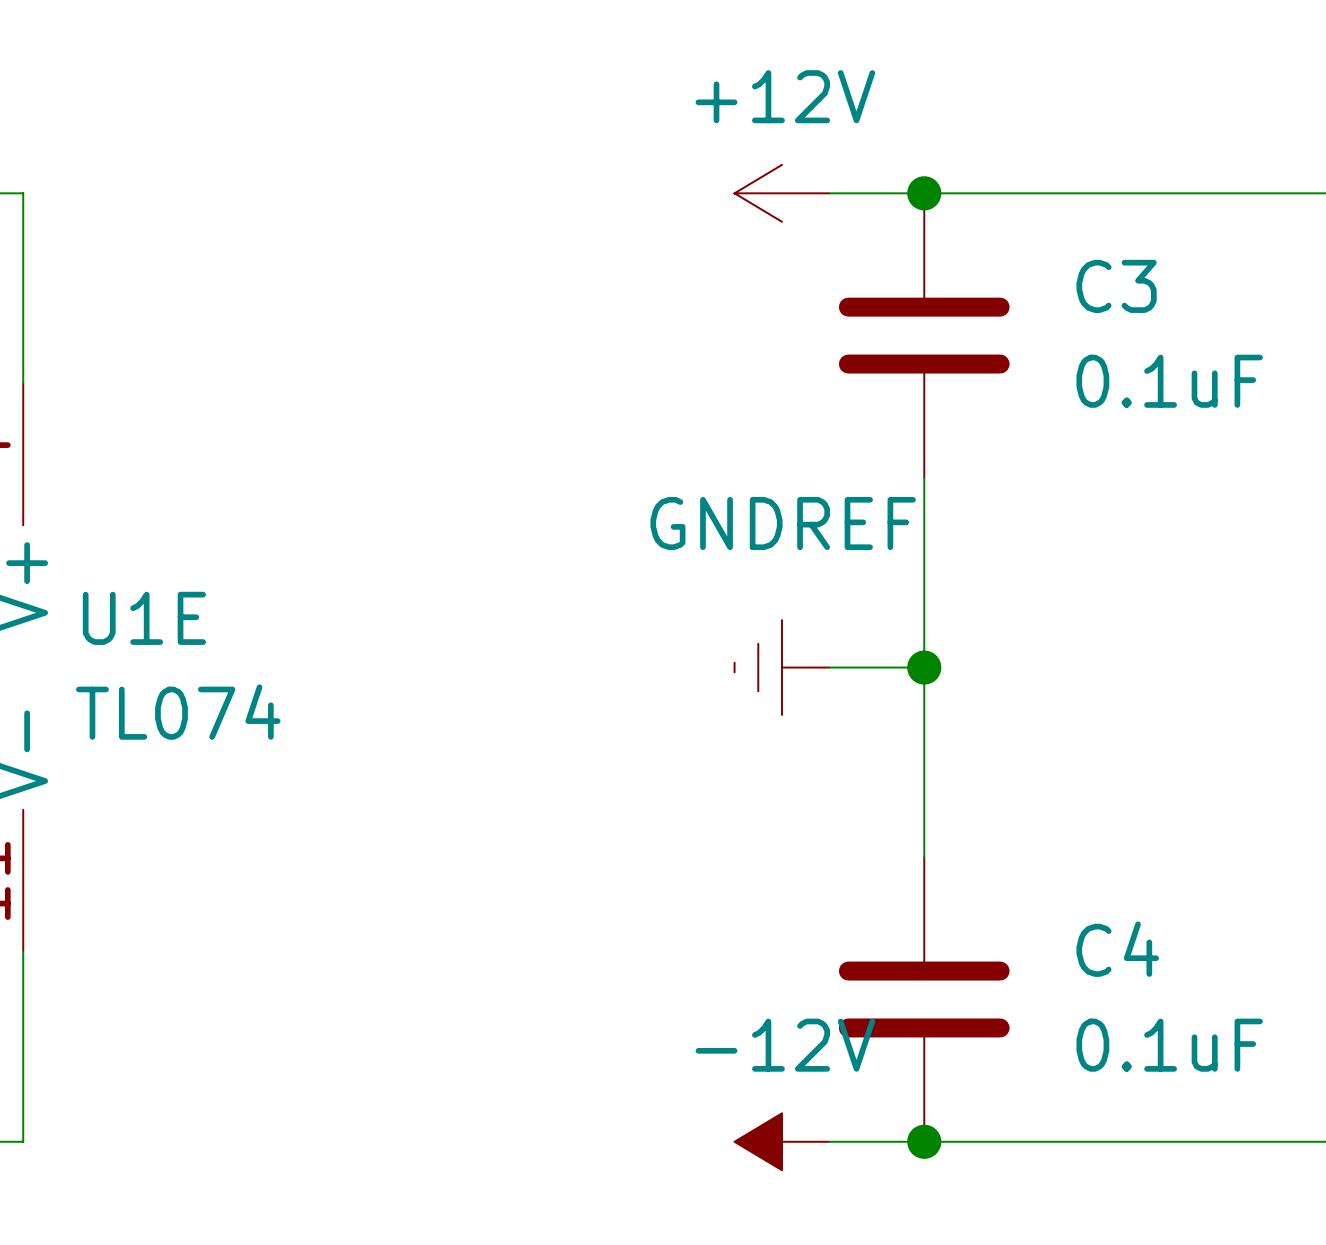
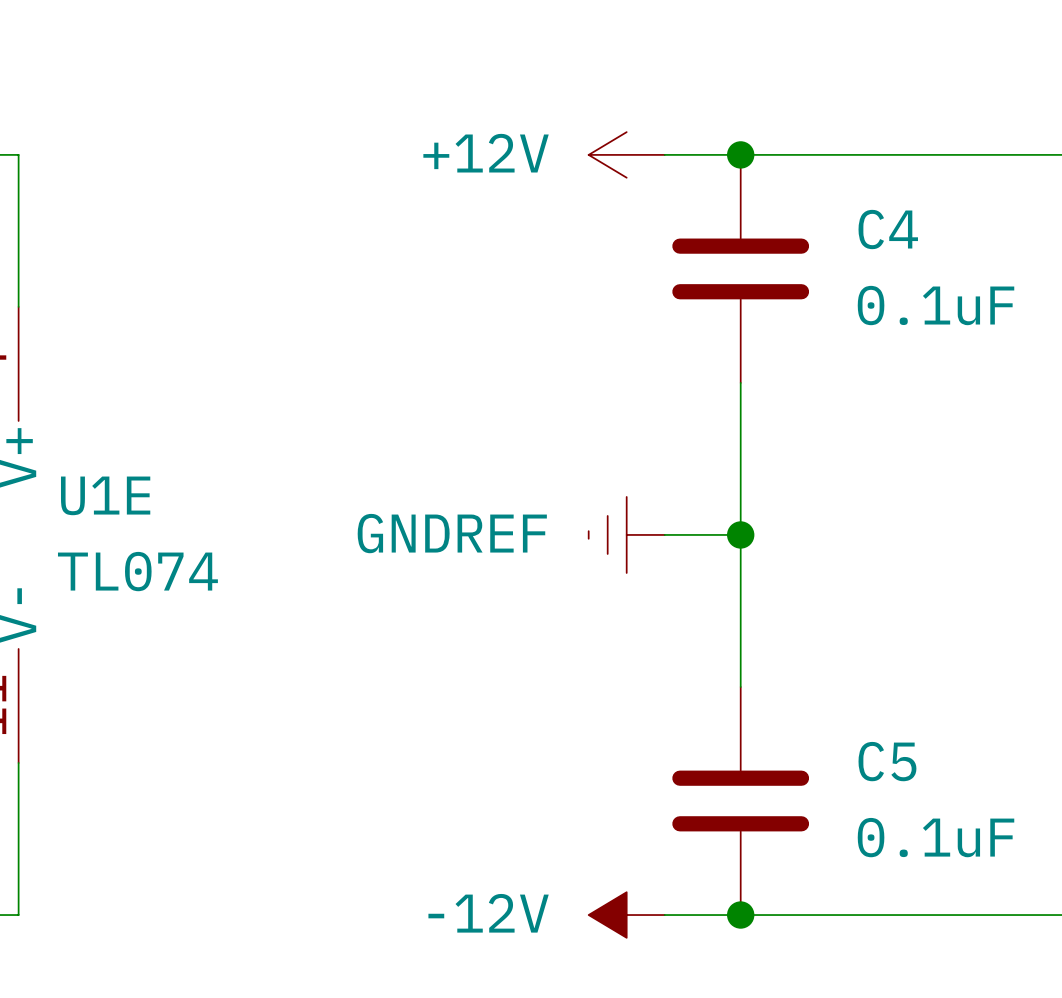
power symbol text position: +12V (785, 96) -> +12V (486, 153)
C3 name: C3 (1116, 286) -> C4 (888, 229)
power symbol text position: GNDREF (783, 523) -> GNDREF (452, 533)
C4 name: C4 (1117, 949) -> C5 (887, 761)
power symbol text position: -12V (785, 1045) -> -12V (488, 913)

